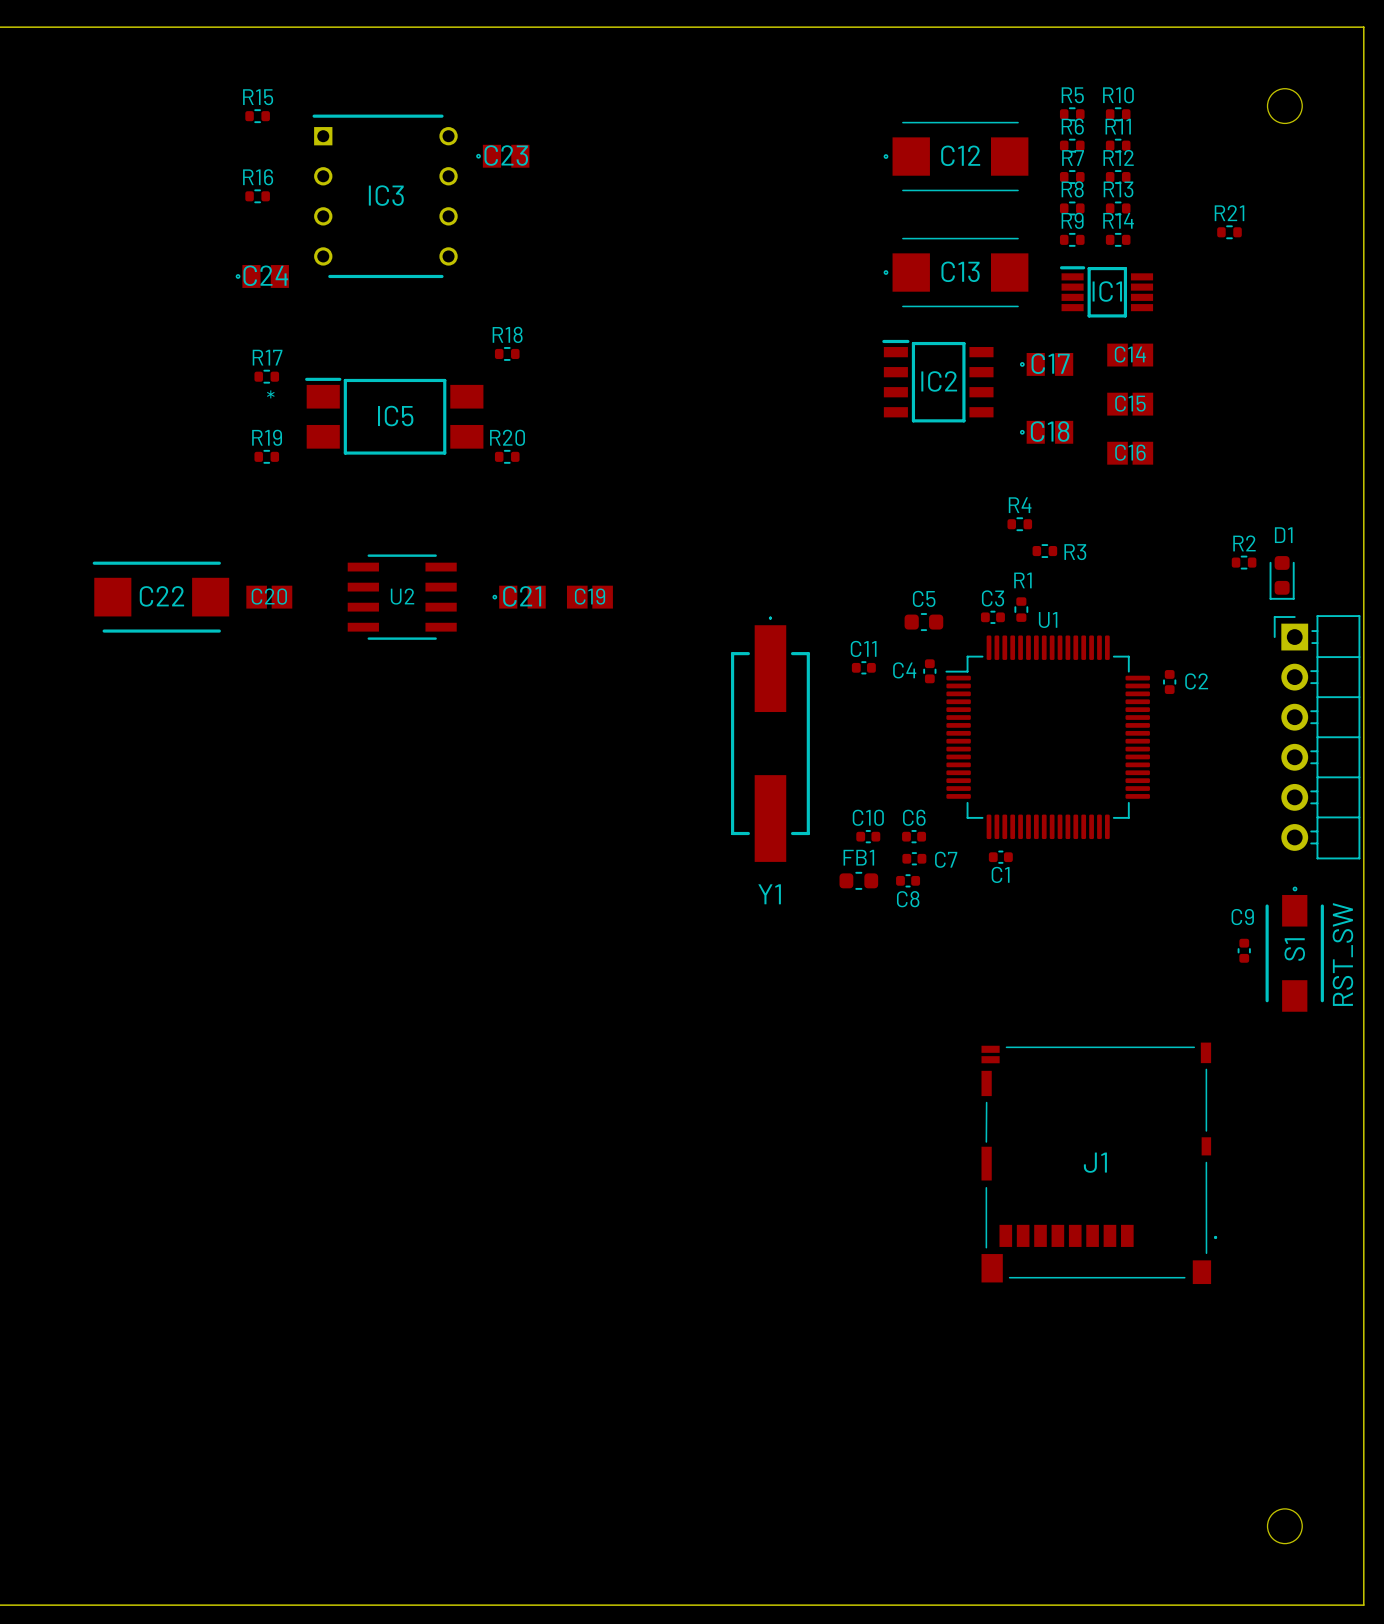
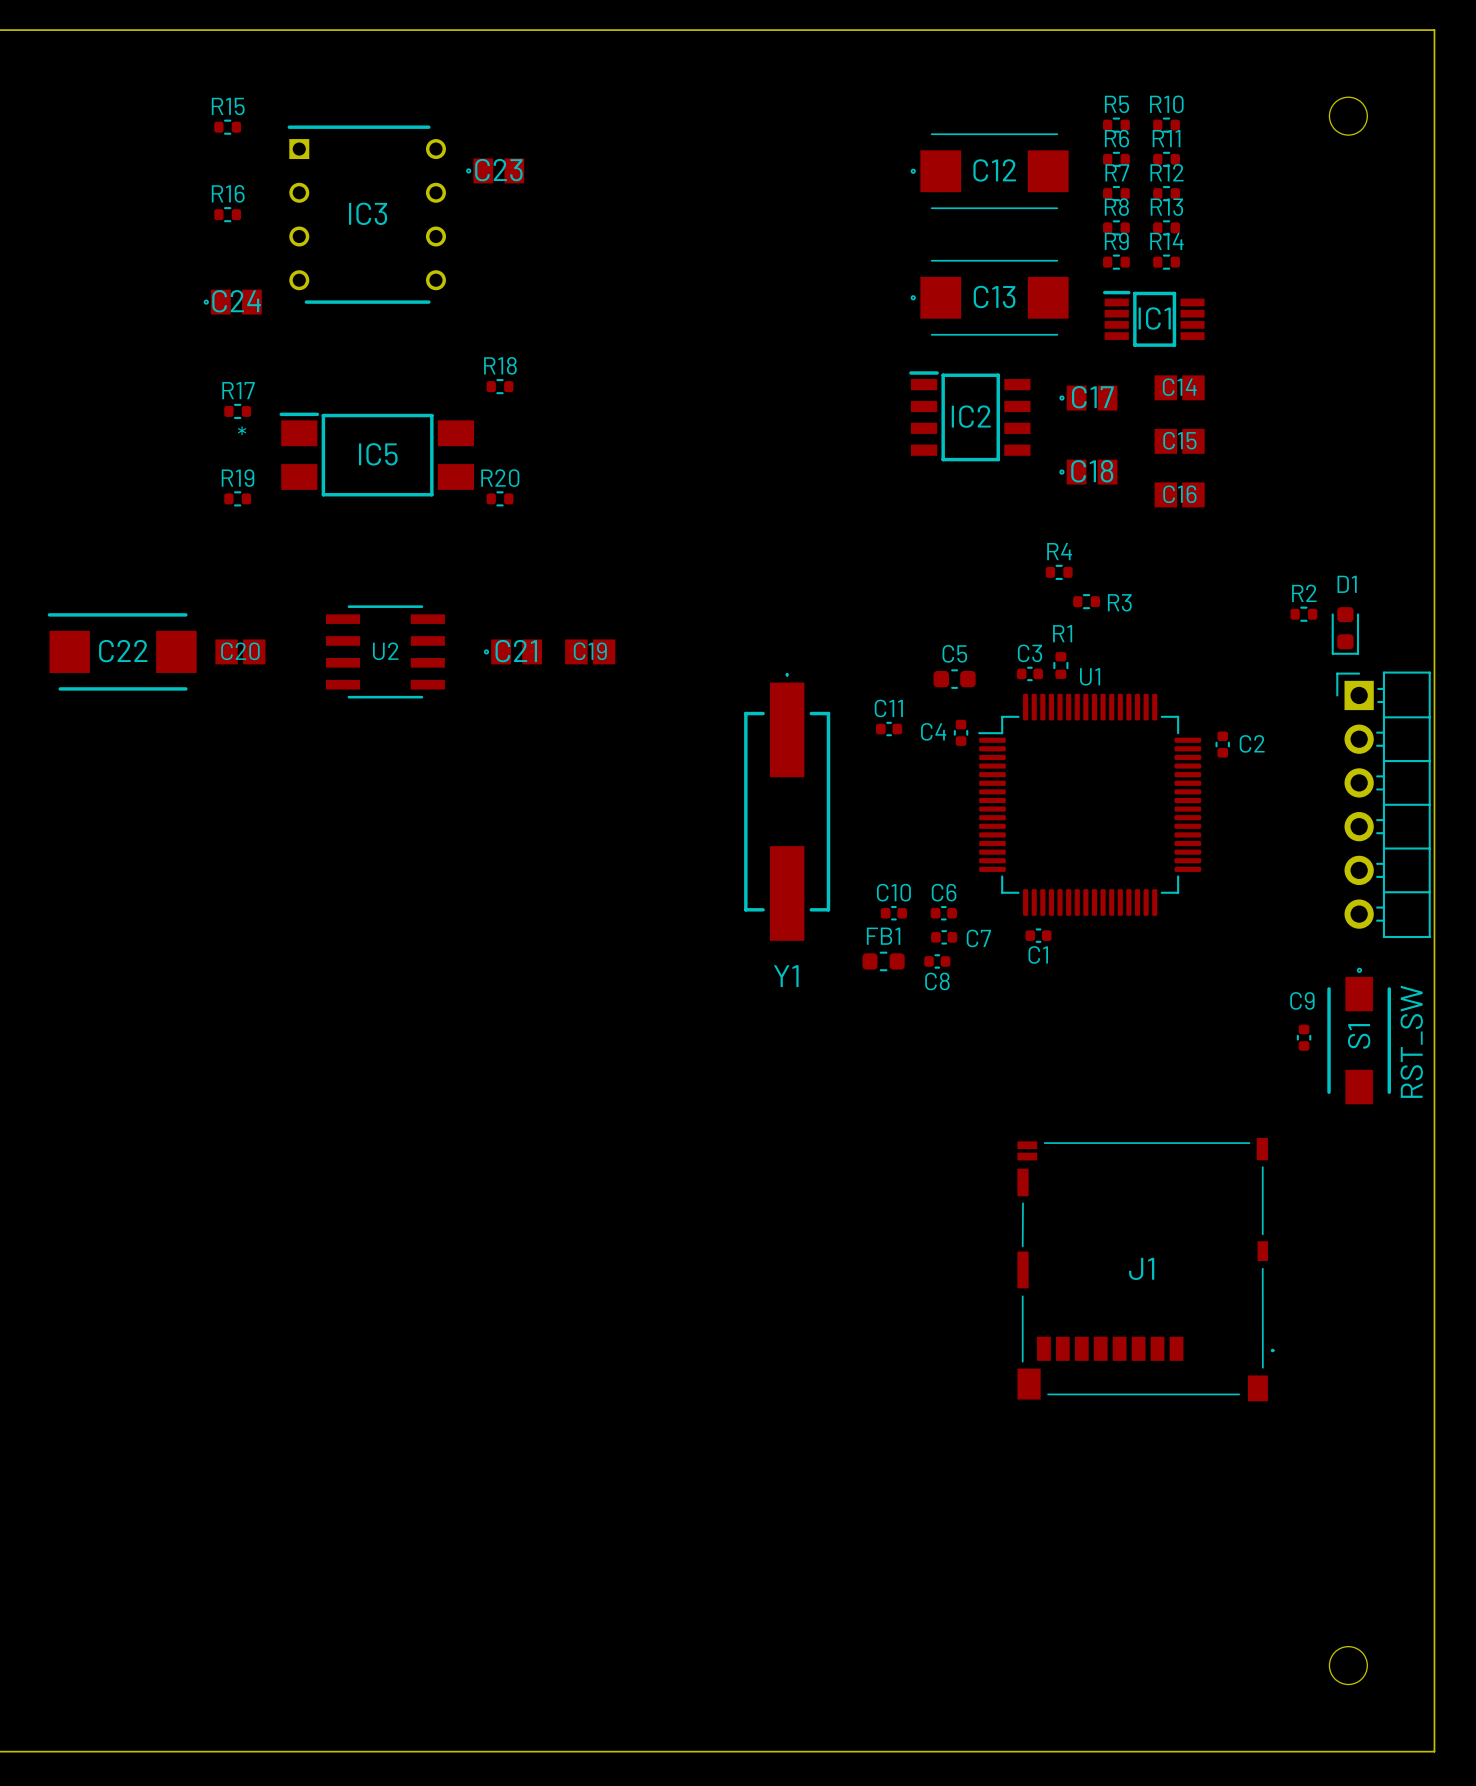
R21: (1229, 232) -> none

